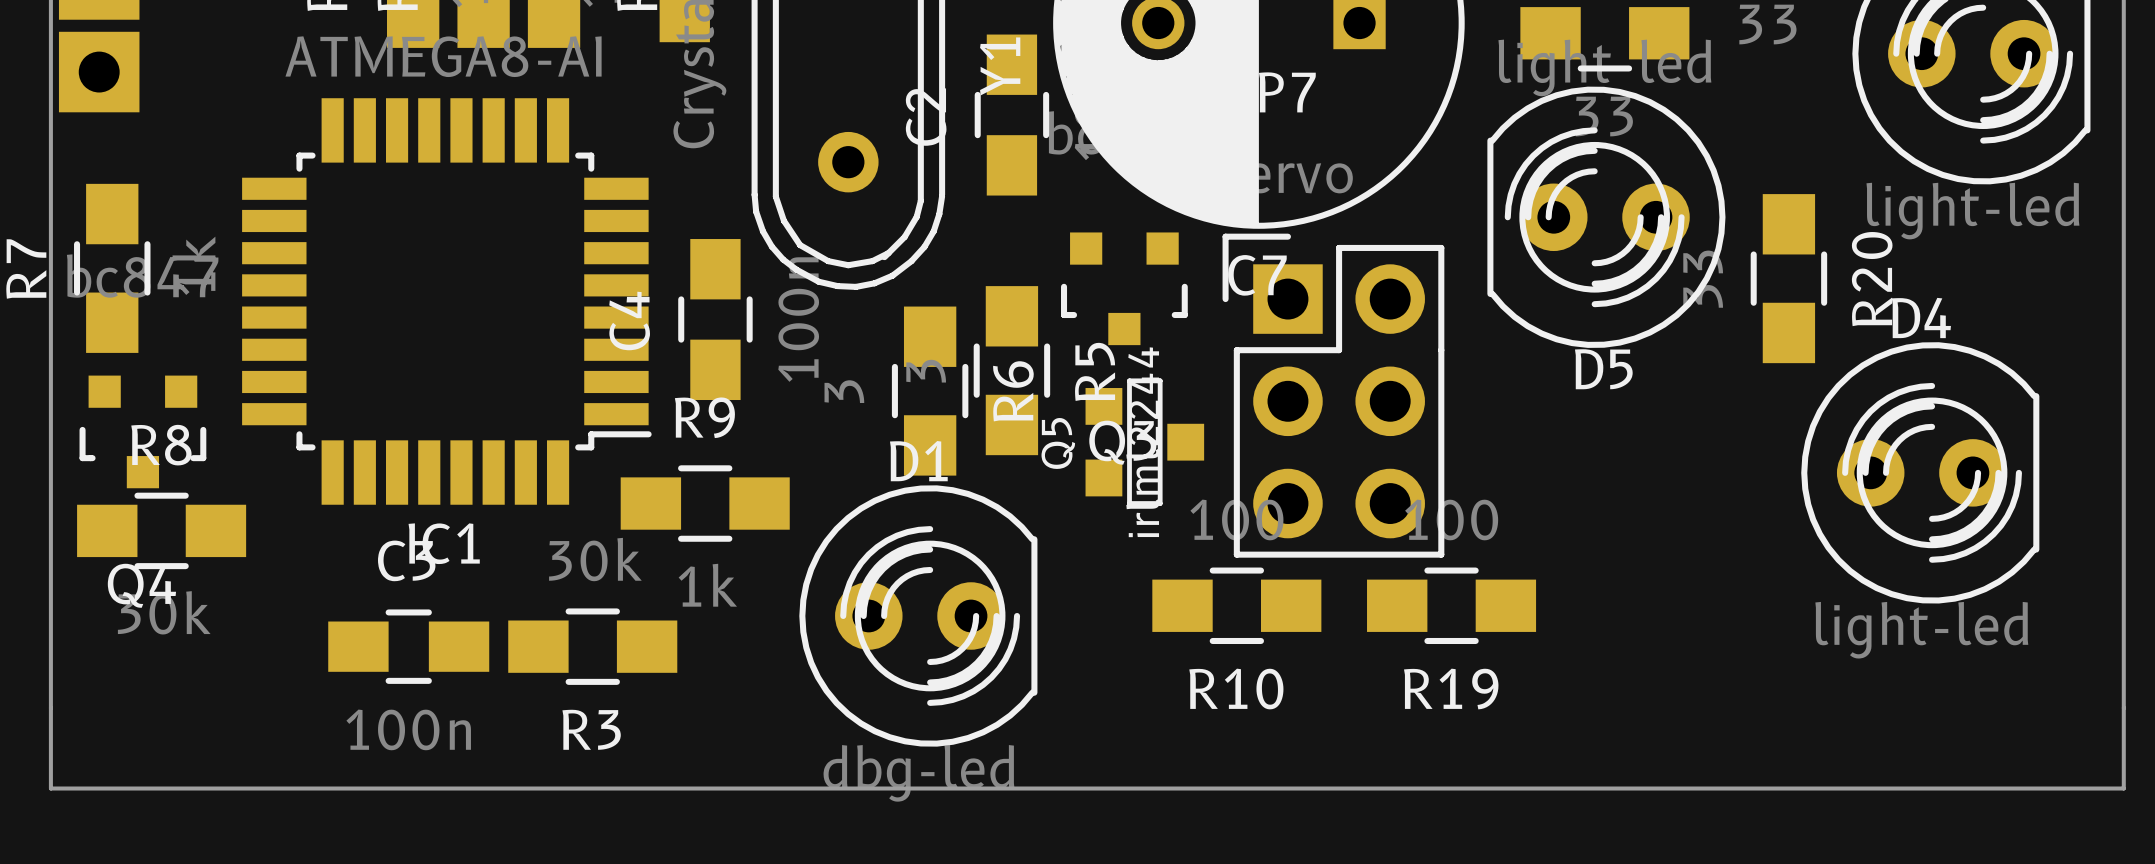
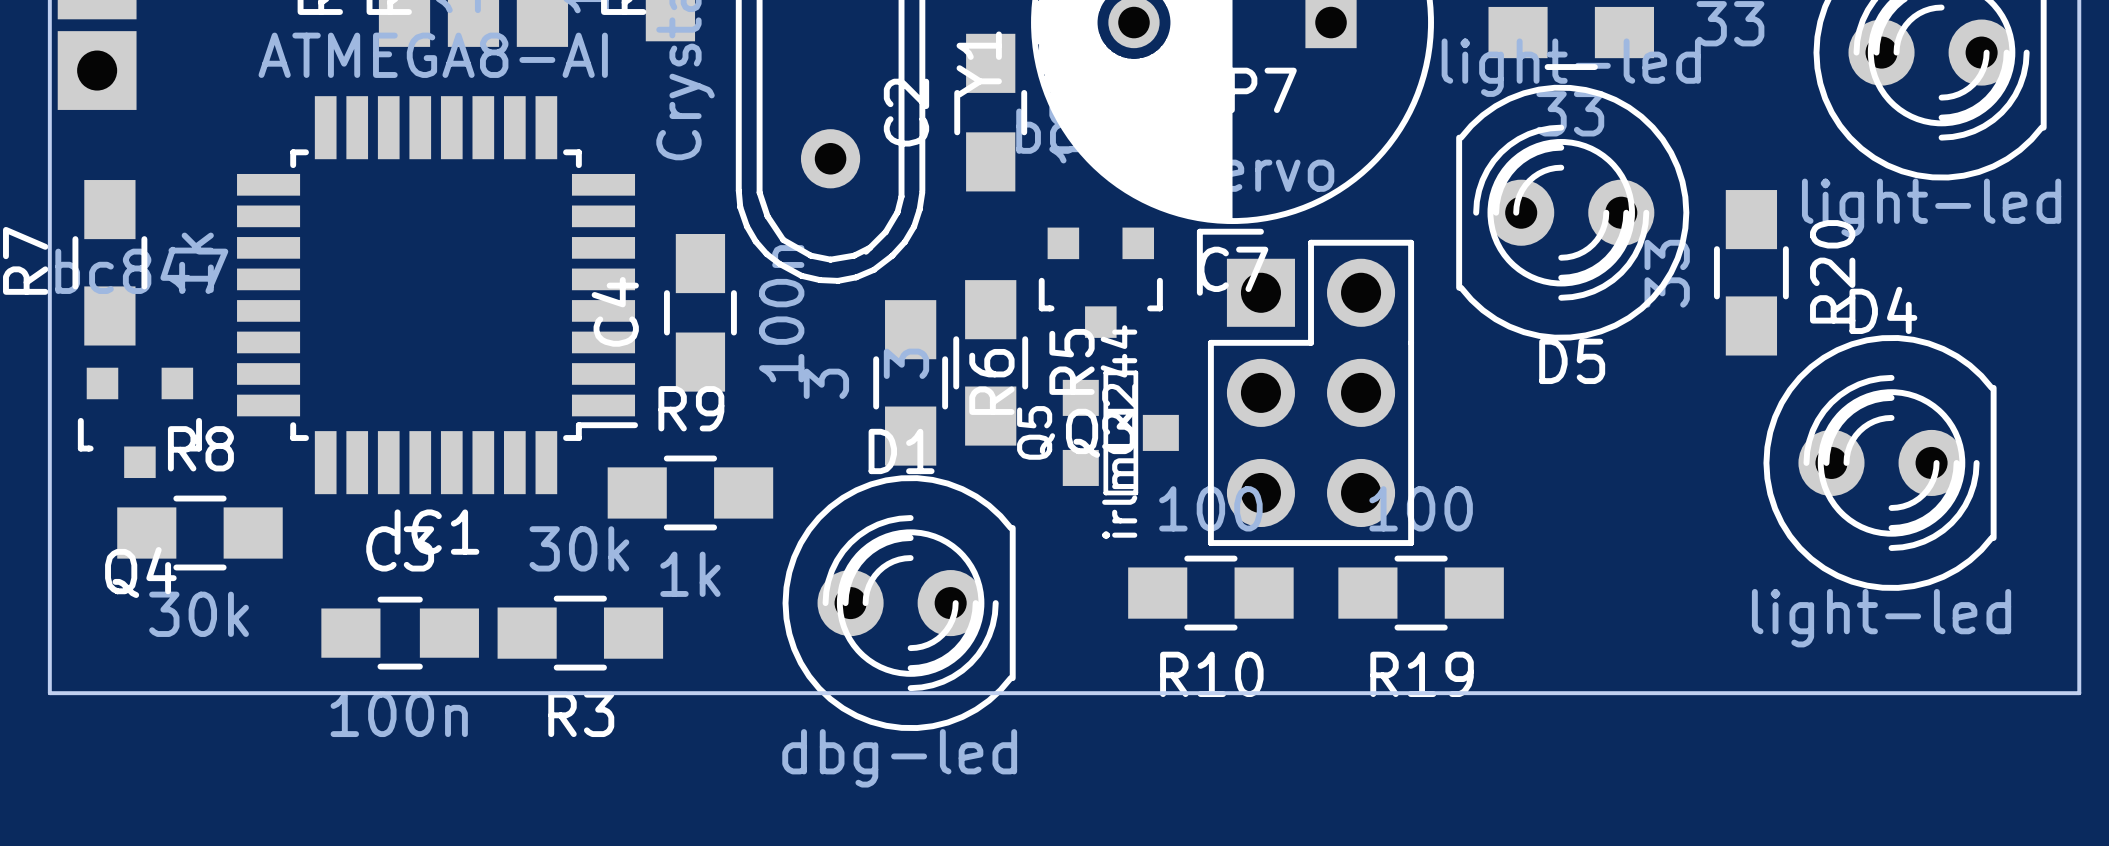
R8 position: (161, 530) -> (199, 533)
board edge: (50, 708) (50, 788) (2123, 788) (2123, 708) -> (49, 693) (2079, 693)

